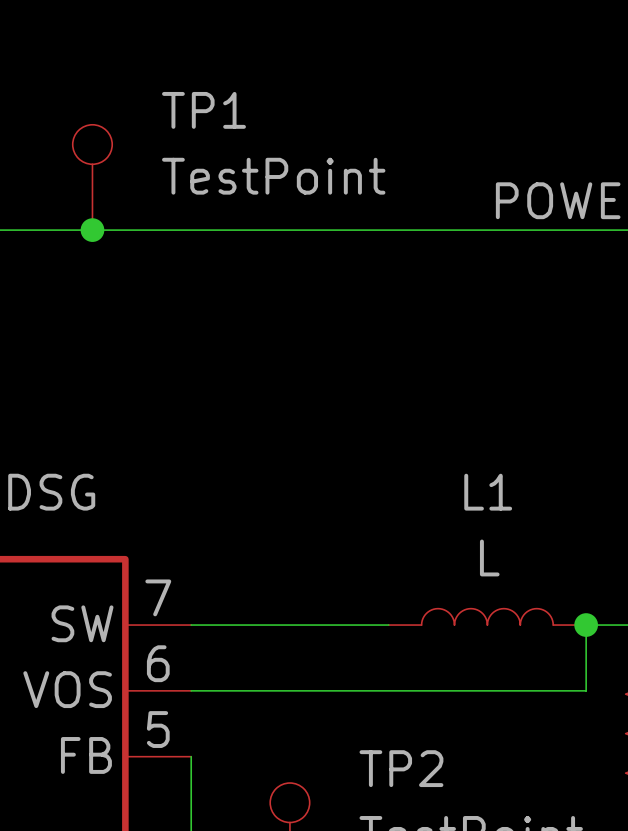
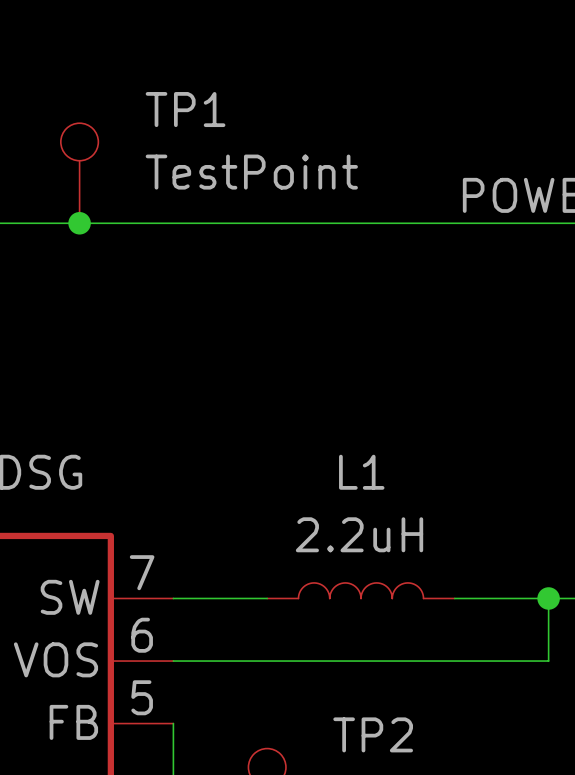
L1 value: L (489, 557) -> 2.2uH (359, 534)
L1 position: (487, 616) -> (361, 590)
wire: (289, 625) (388, 625) -> (454, 598) (548, 598)

